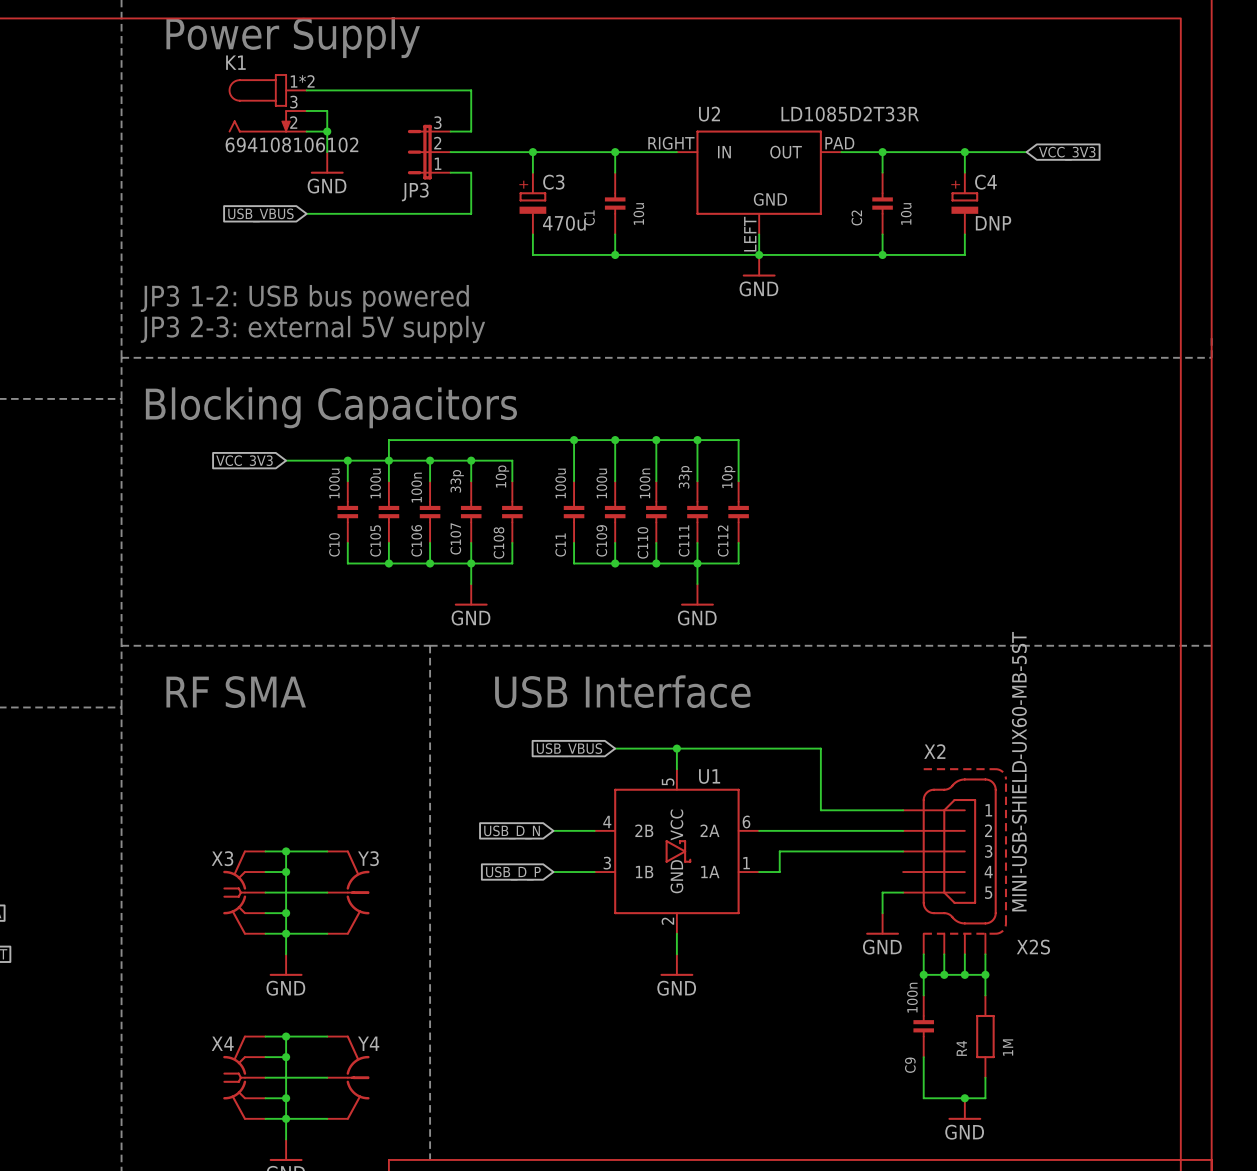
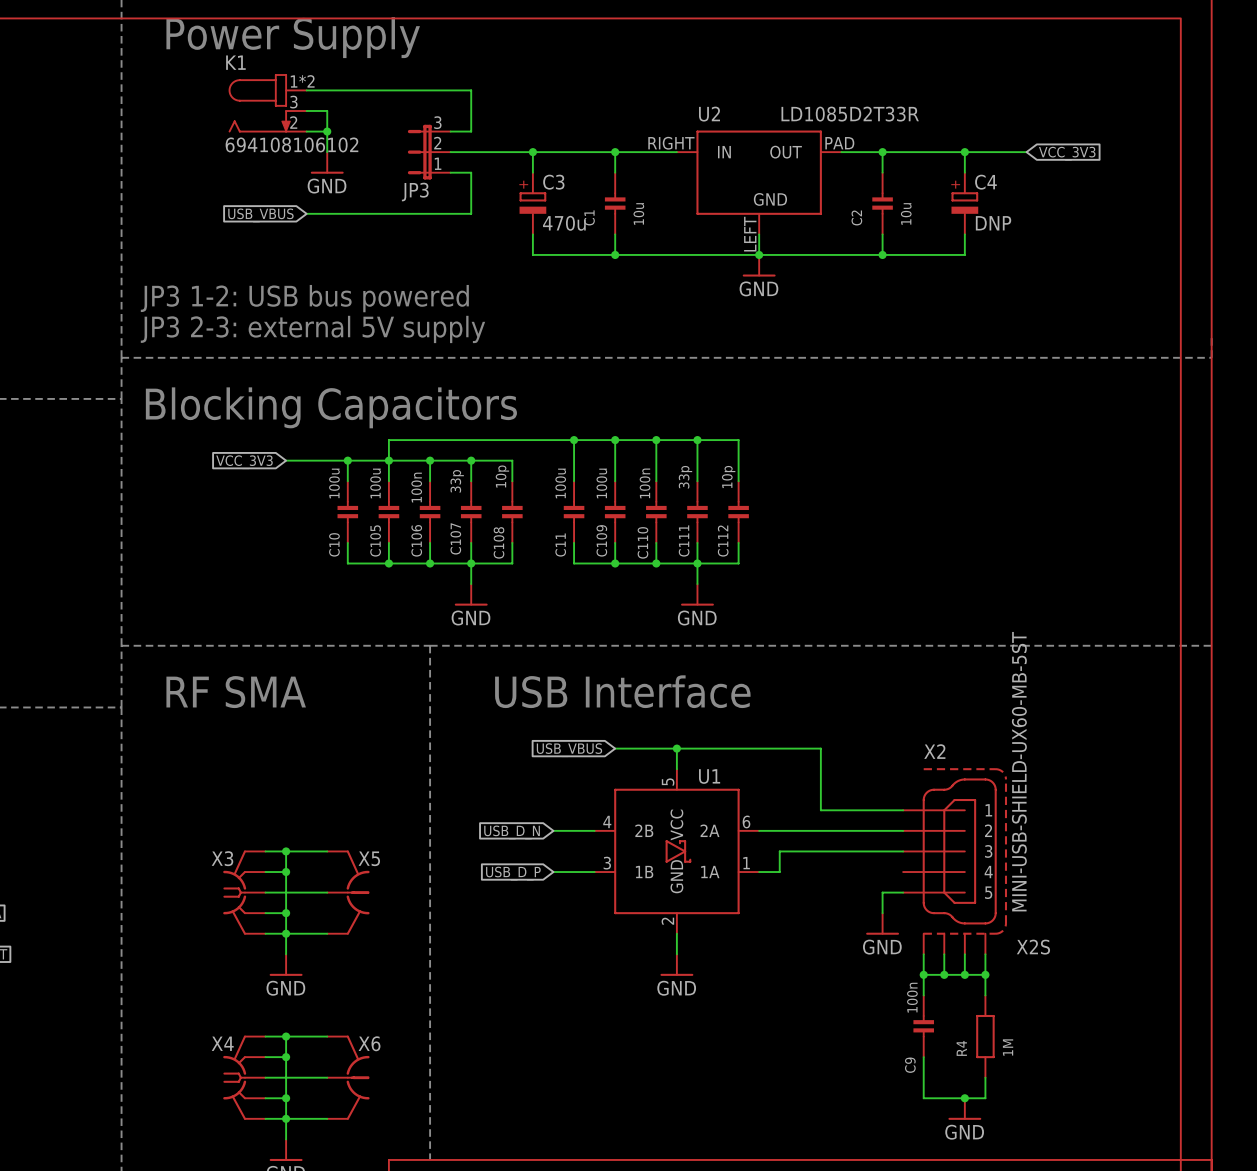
Y3 name: Y3 (368, 858) -> X5 (369, 858)
Y4 name: Y4 (368, 1043) -> X6 (369, 1043)

